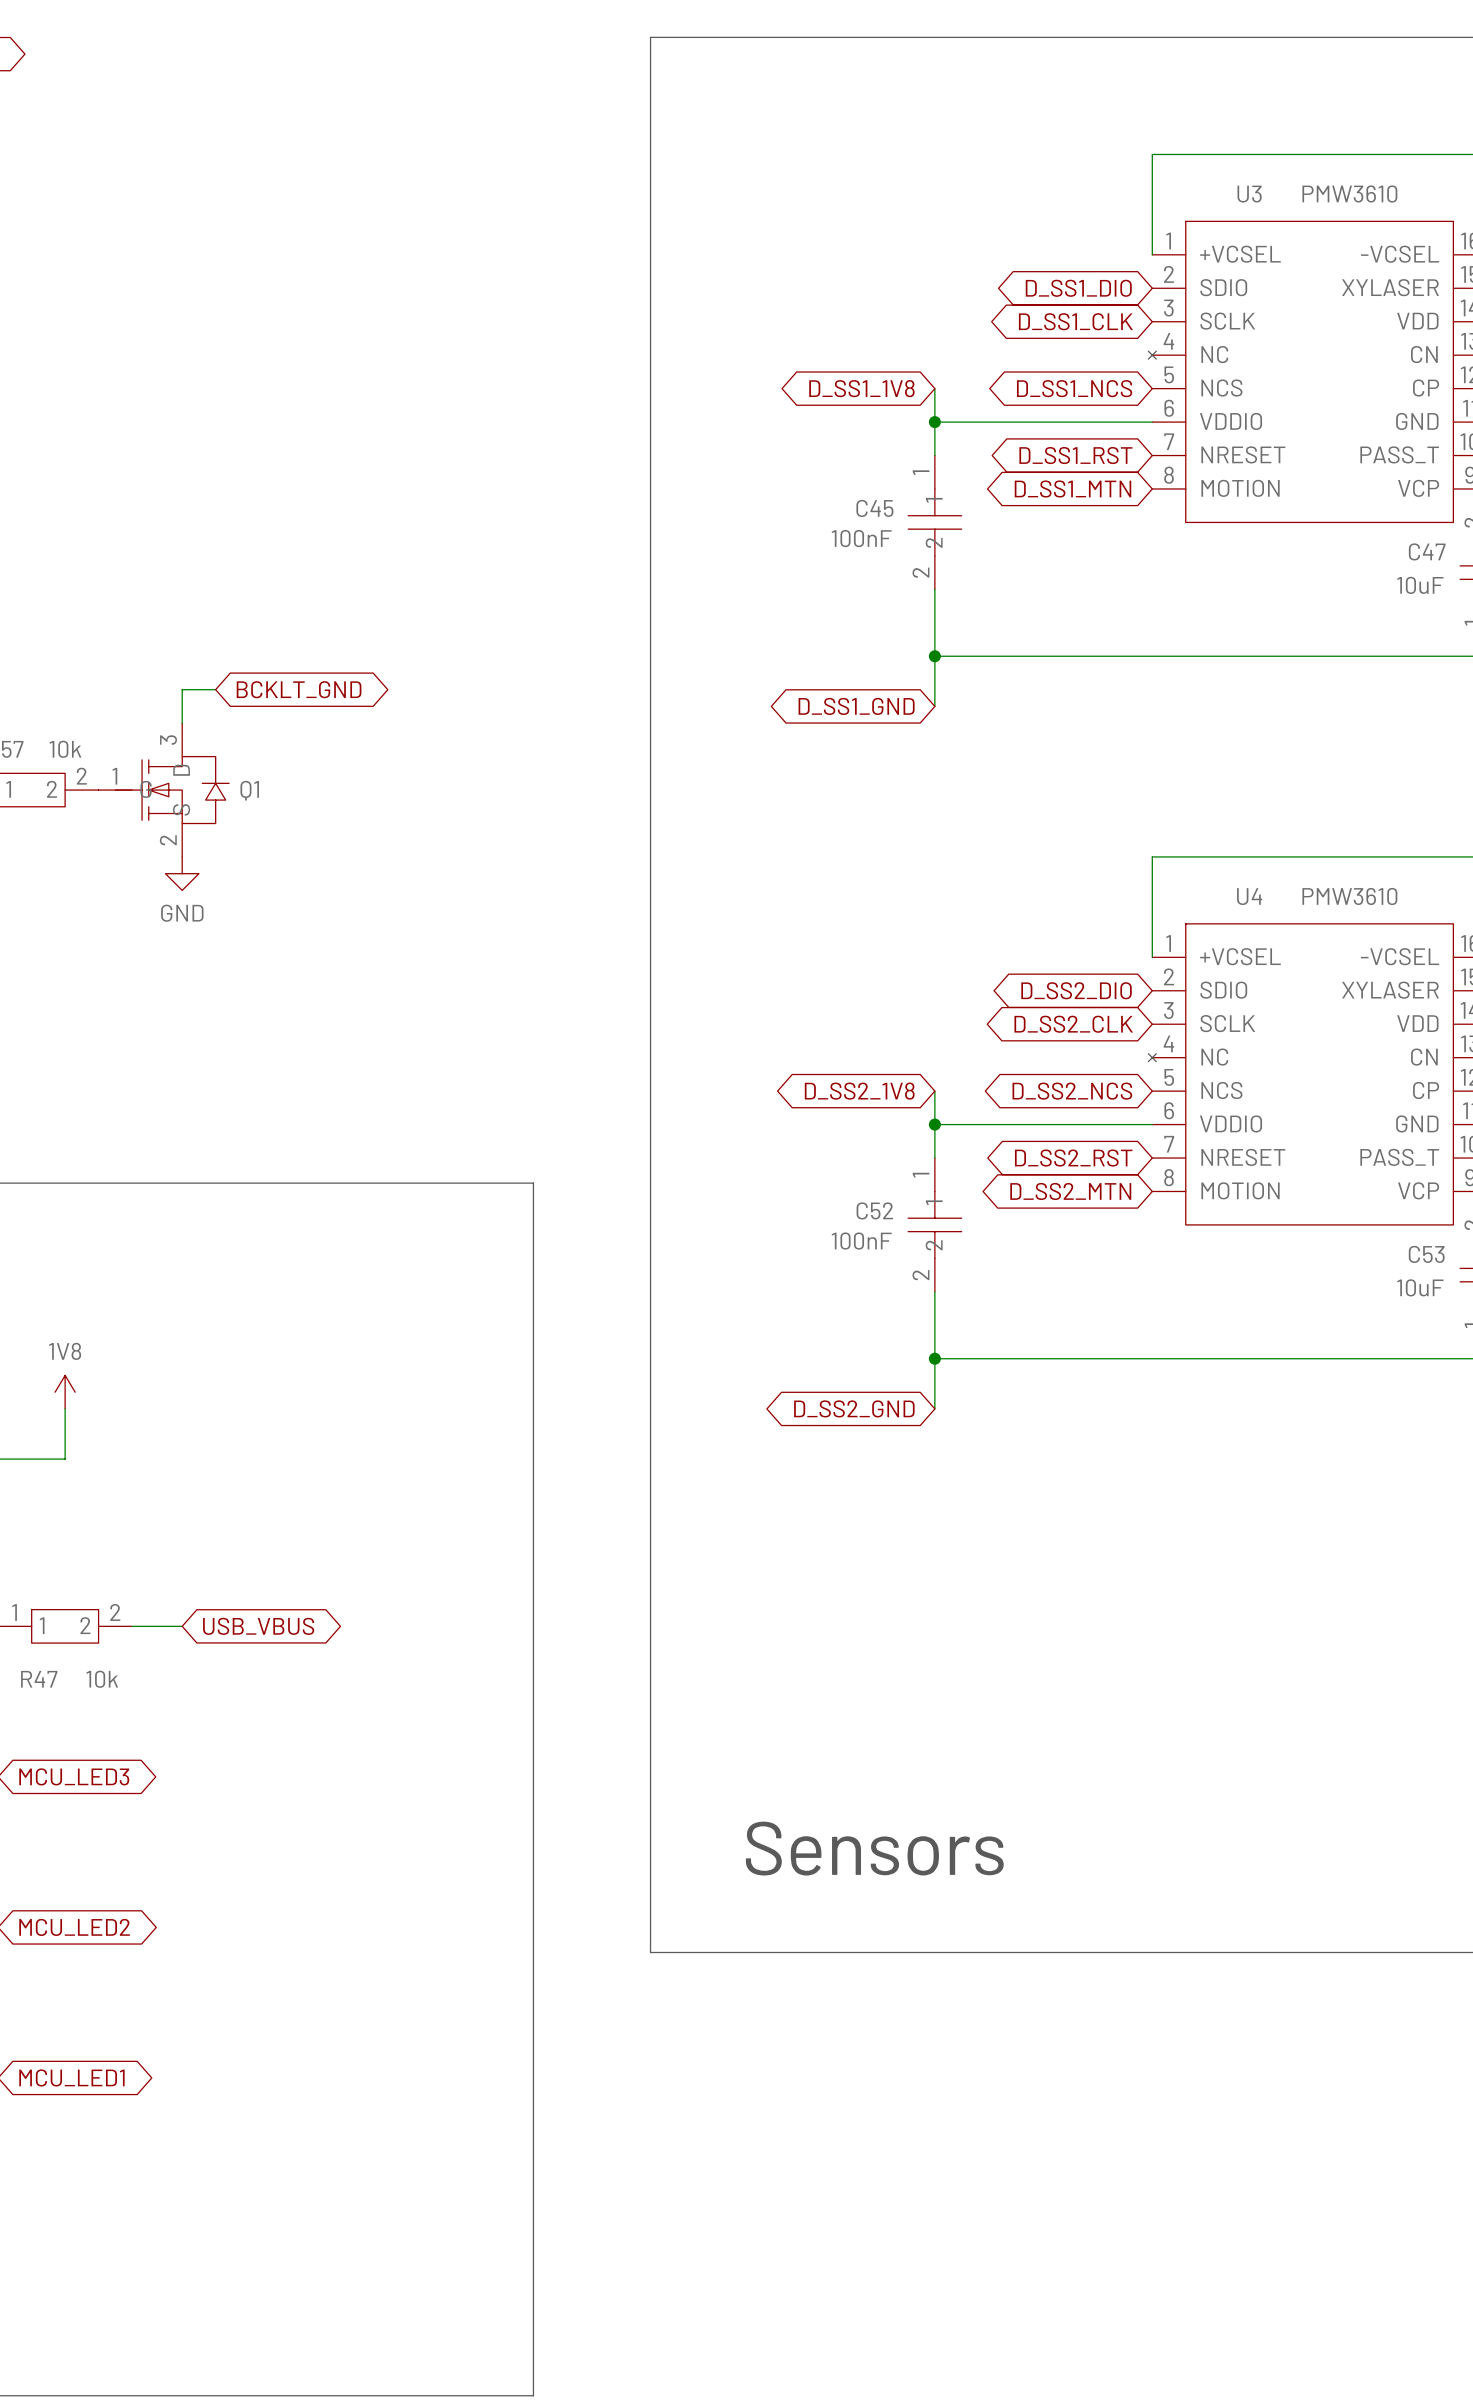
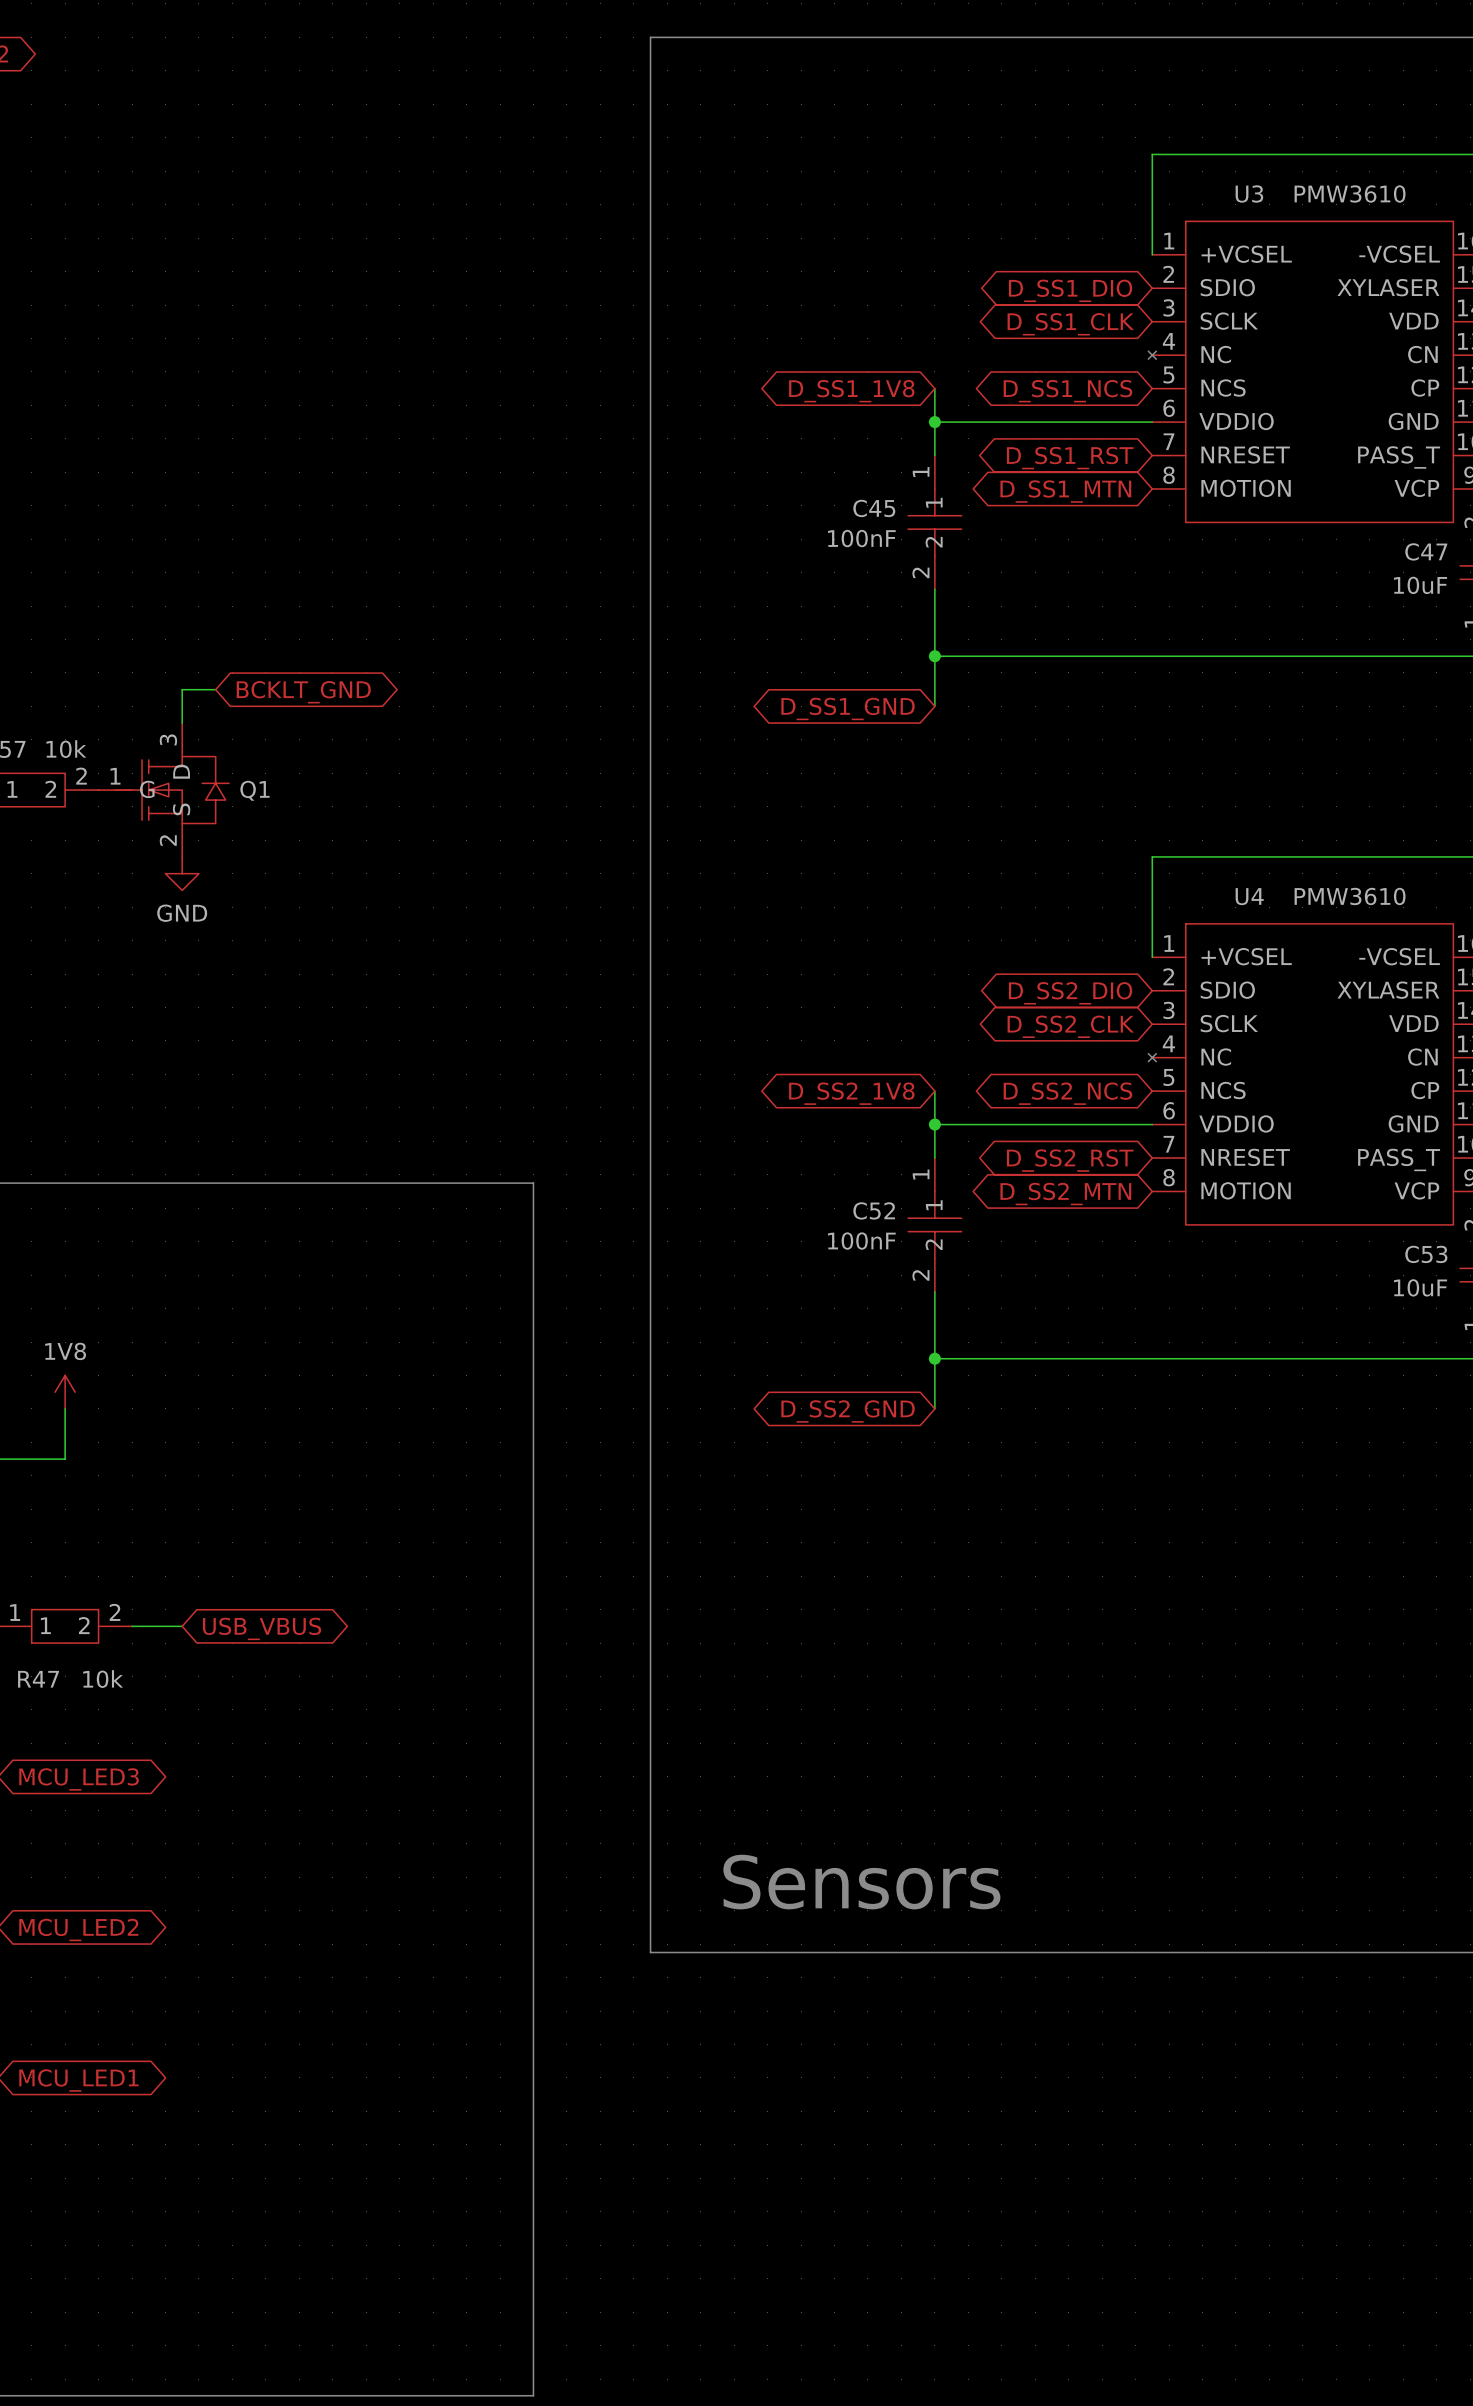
text position: Sensors (874, 1848) -> Sensors (861, 1882)

